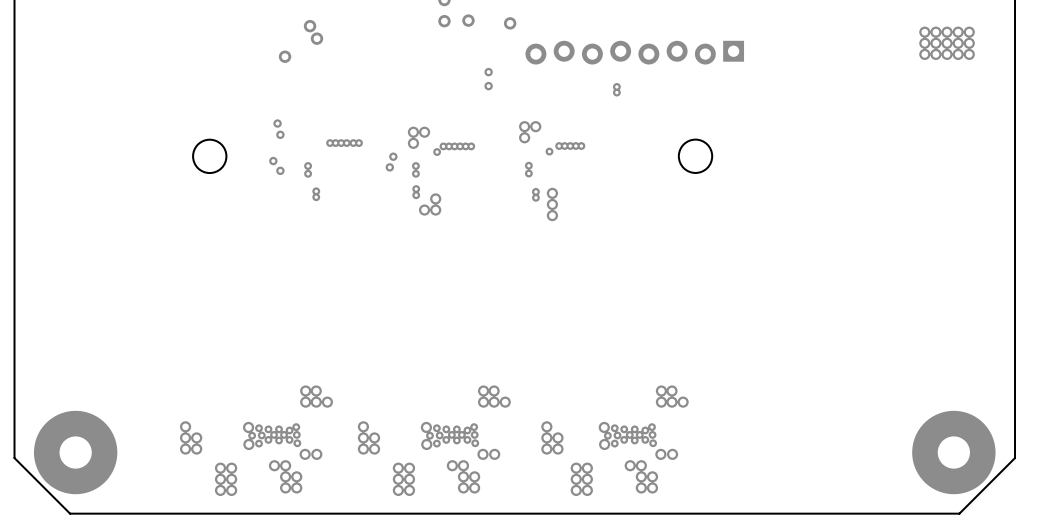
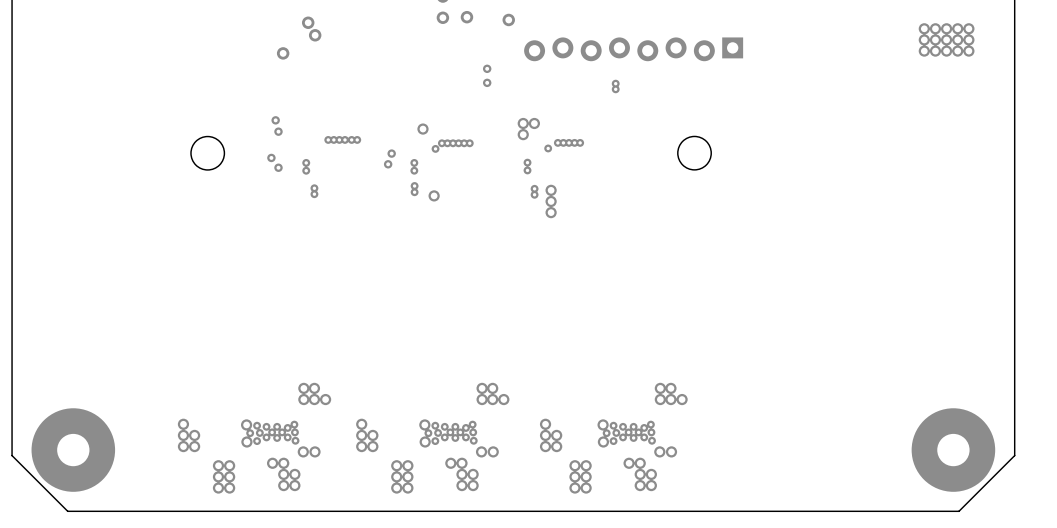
via: (413, 132) -> none
via: (413, 143) -> none
via: (424, 210) -> none
via: (435, 210) -> none

